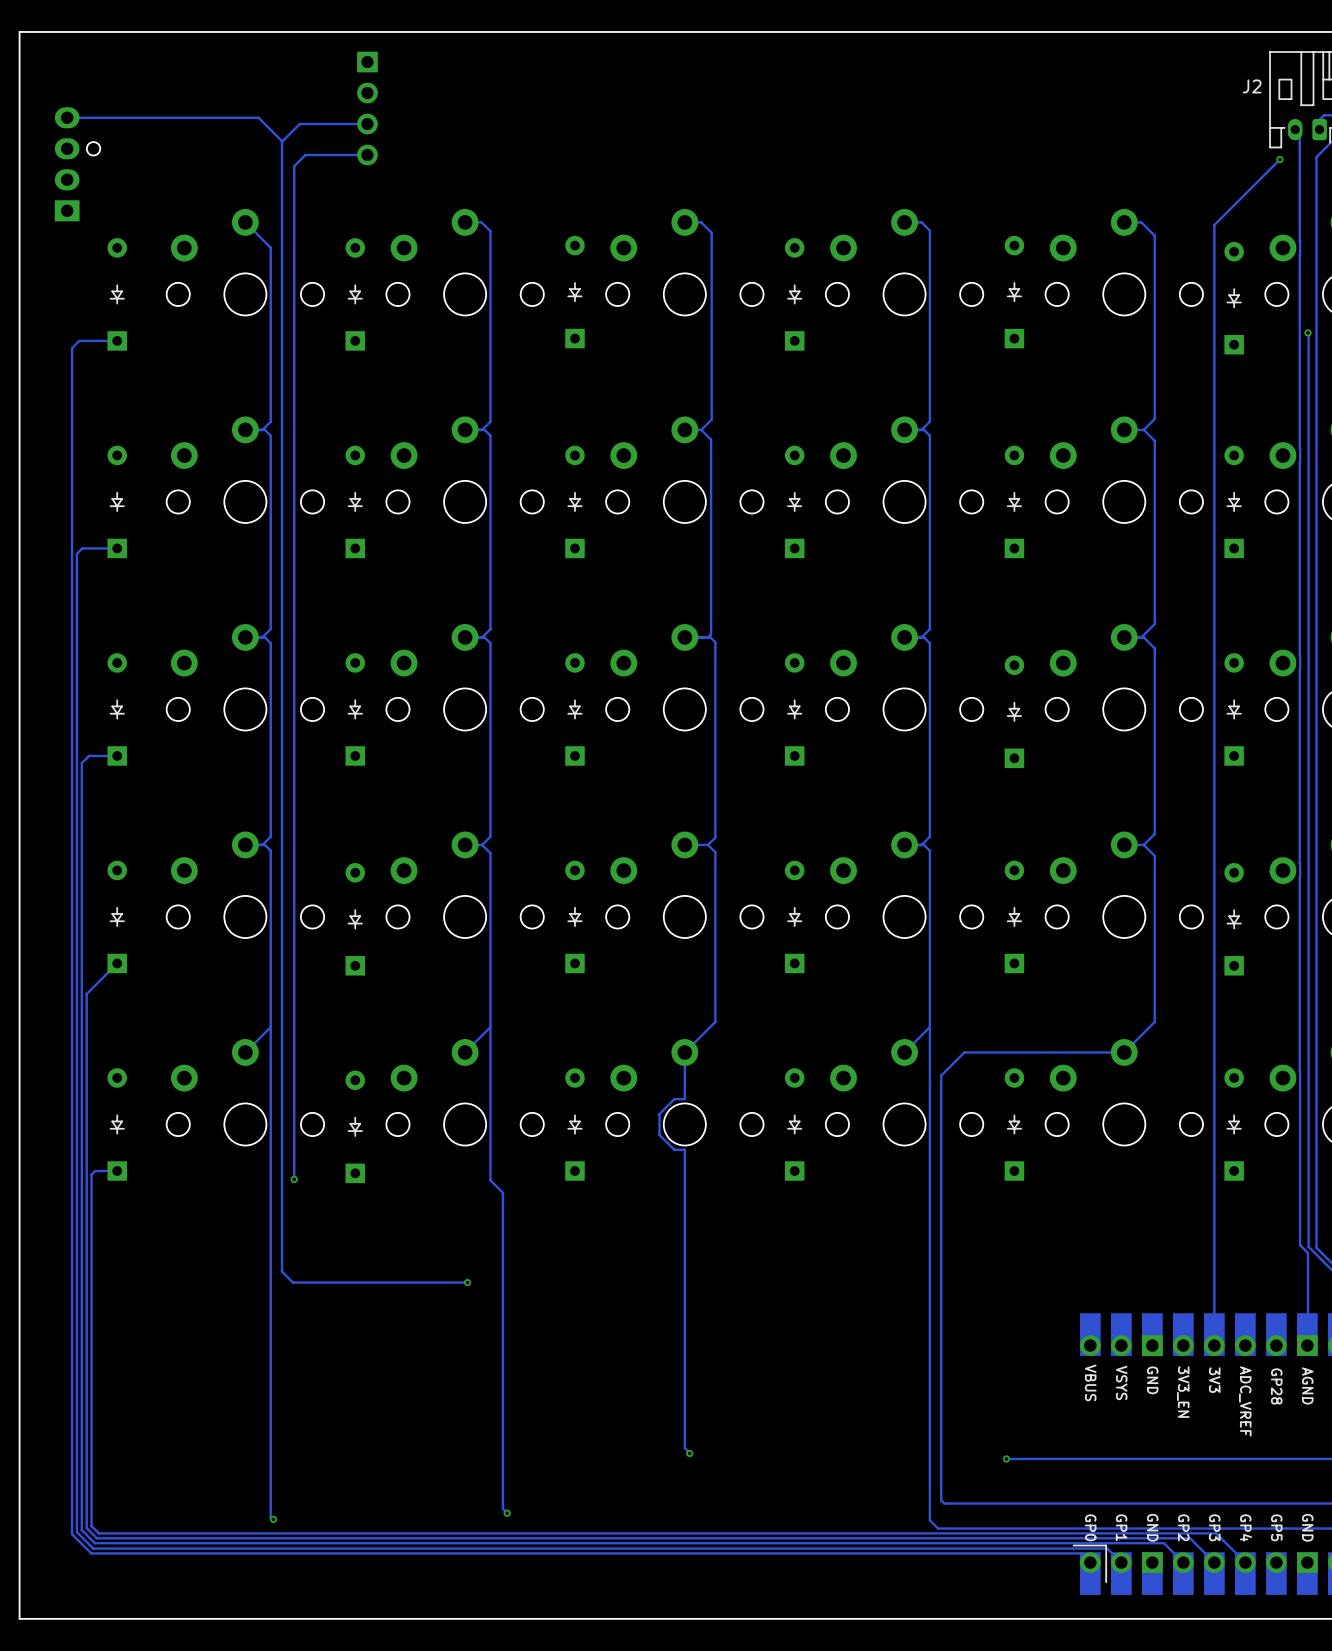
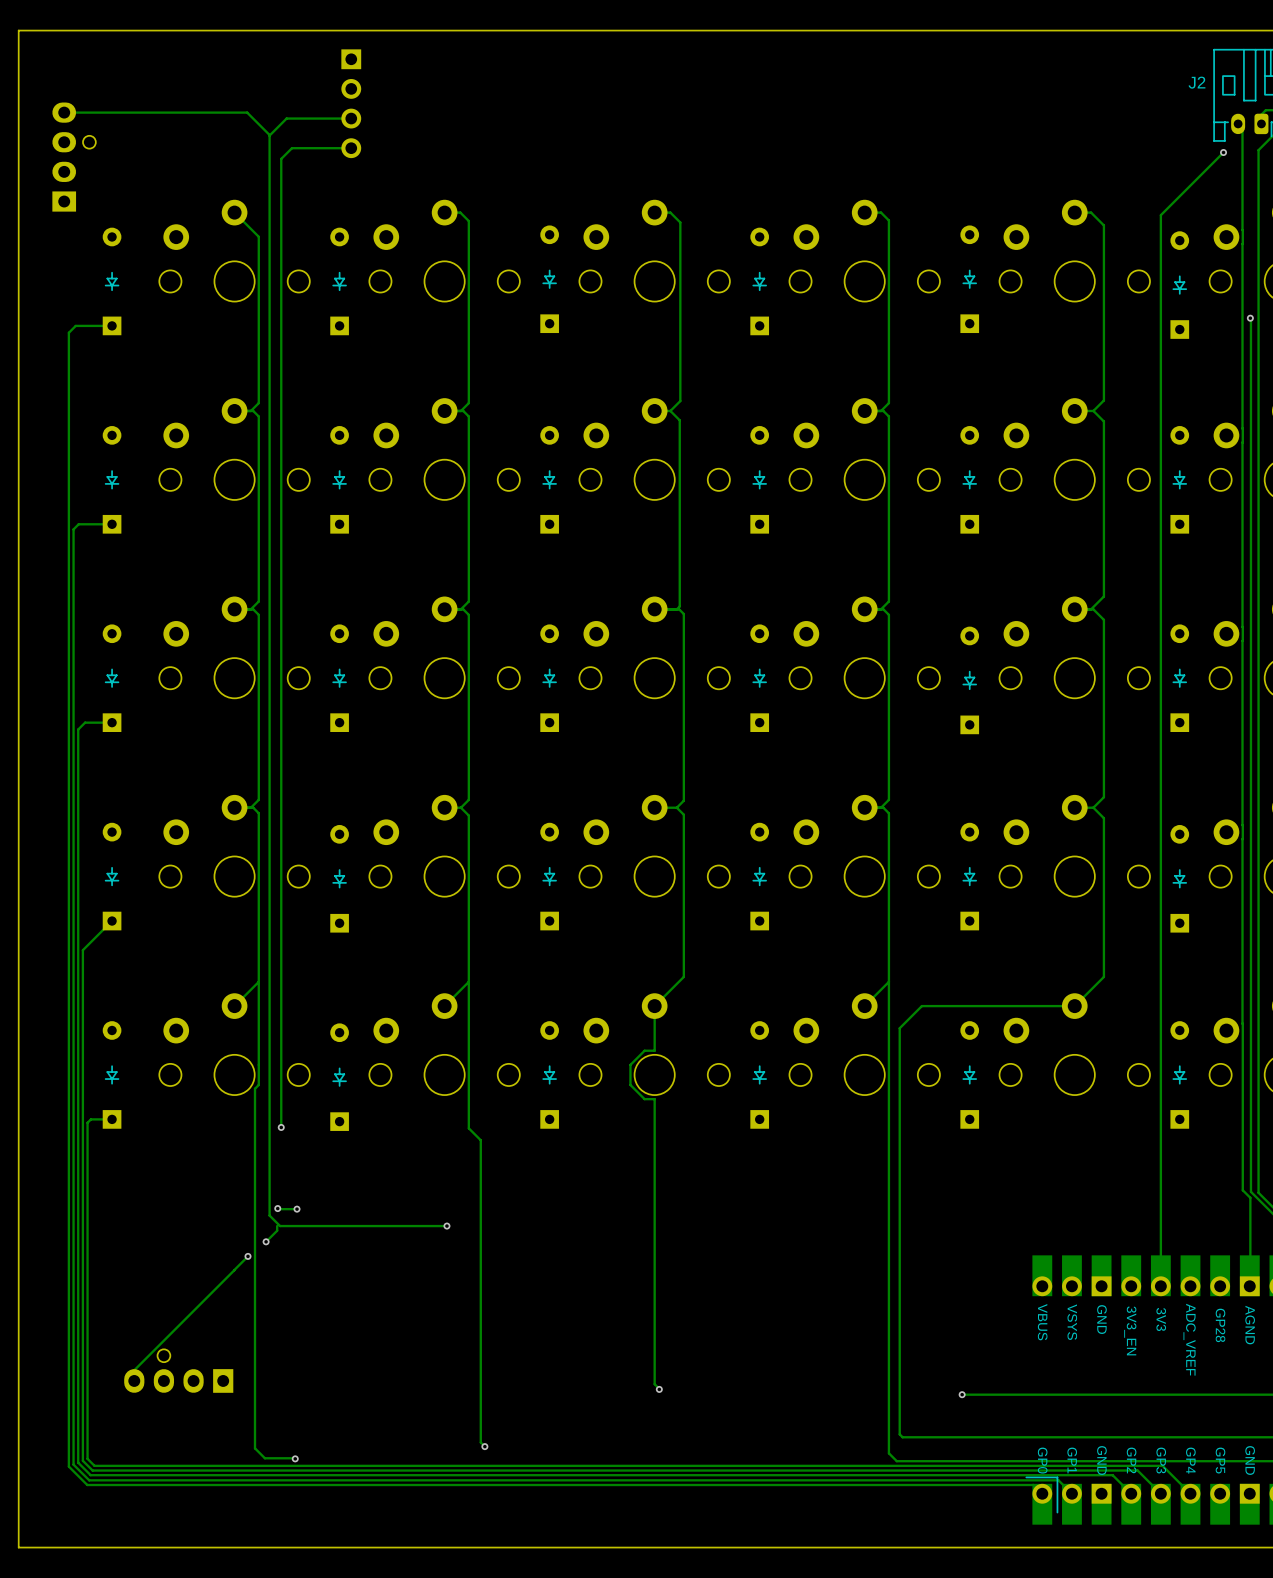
track: (270, 1134) (270, 1517) (273, 1519) -> (258, 1084) (255, 1088) (255, 1448) (264, 1458) (295, 1458)
track: none -> (277, 1208) (297, 1209)
via: none -> (277, 1208)
via: none -> (297, 1209)
track: none -> (277, 1226) (277, 1230) (266, 1241)
via: none -> (266, 1241)
track: none -> (248, 1256) (234, 1270)
via: none -> (248, 1256)
track: none -> (234, 1270) (134, 1370) (134, 1380)
part: none -> (178, 1371)
via position: (273, 1519) -> (295, 1458)

